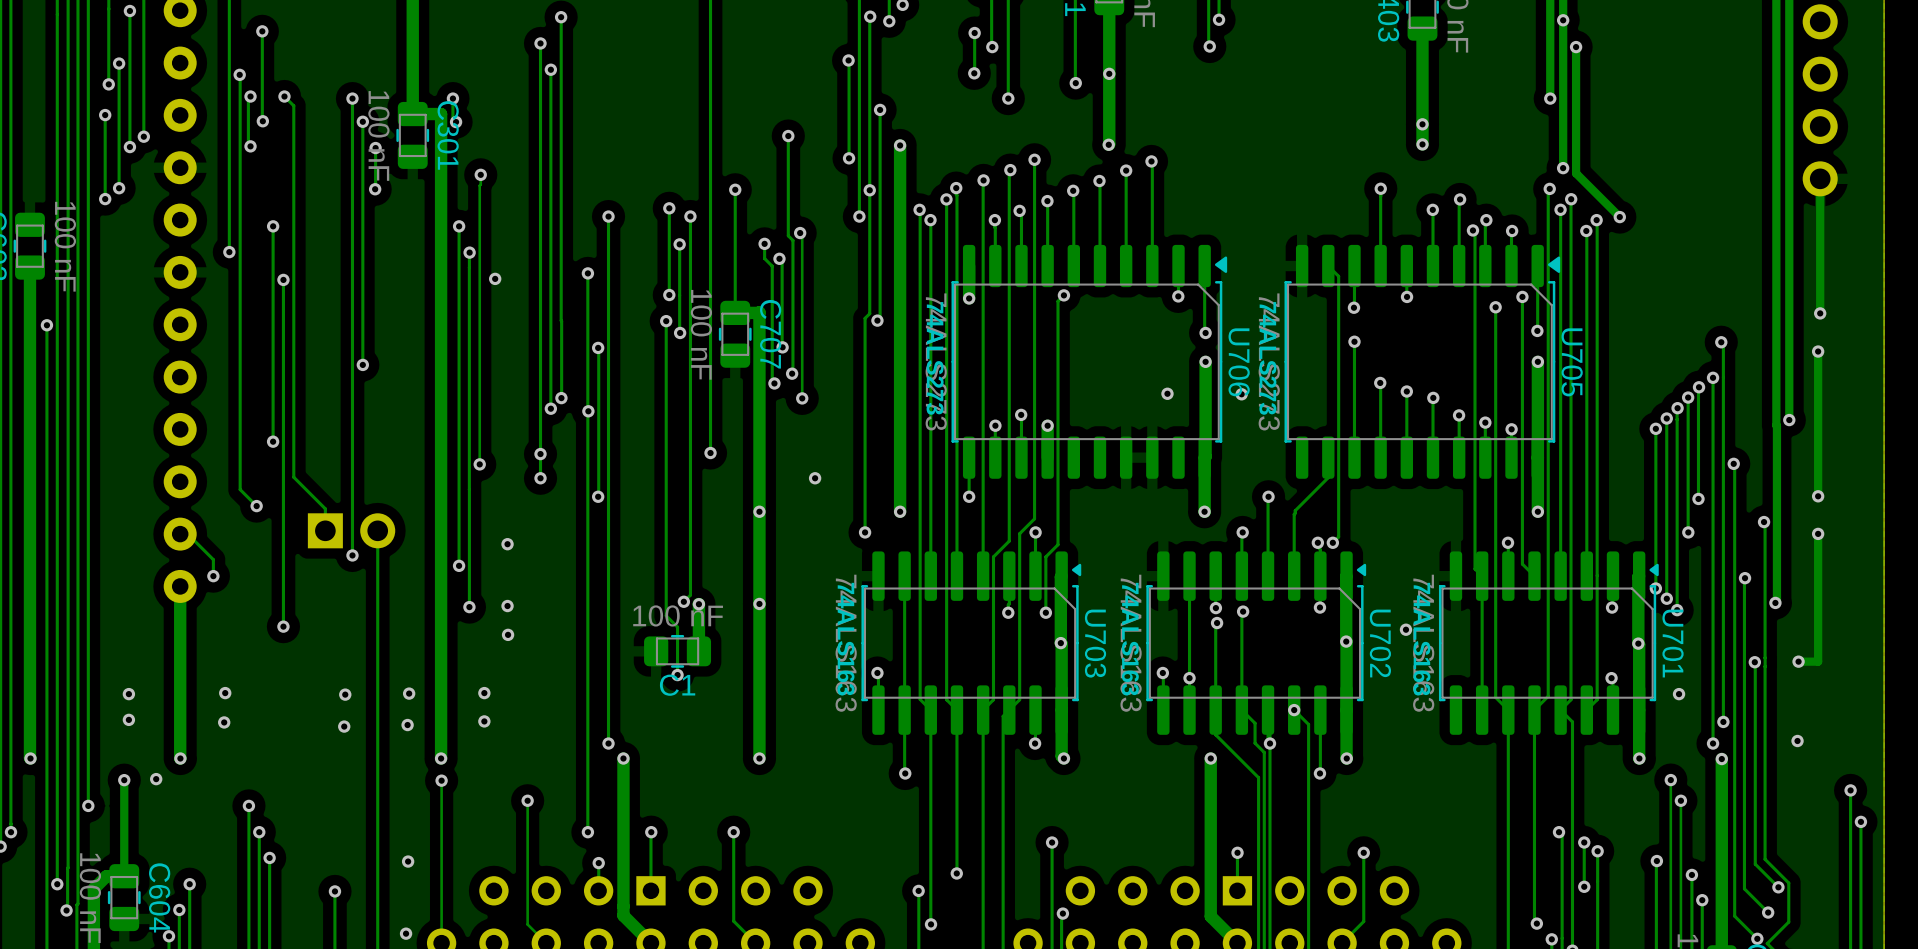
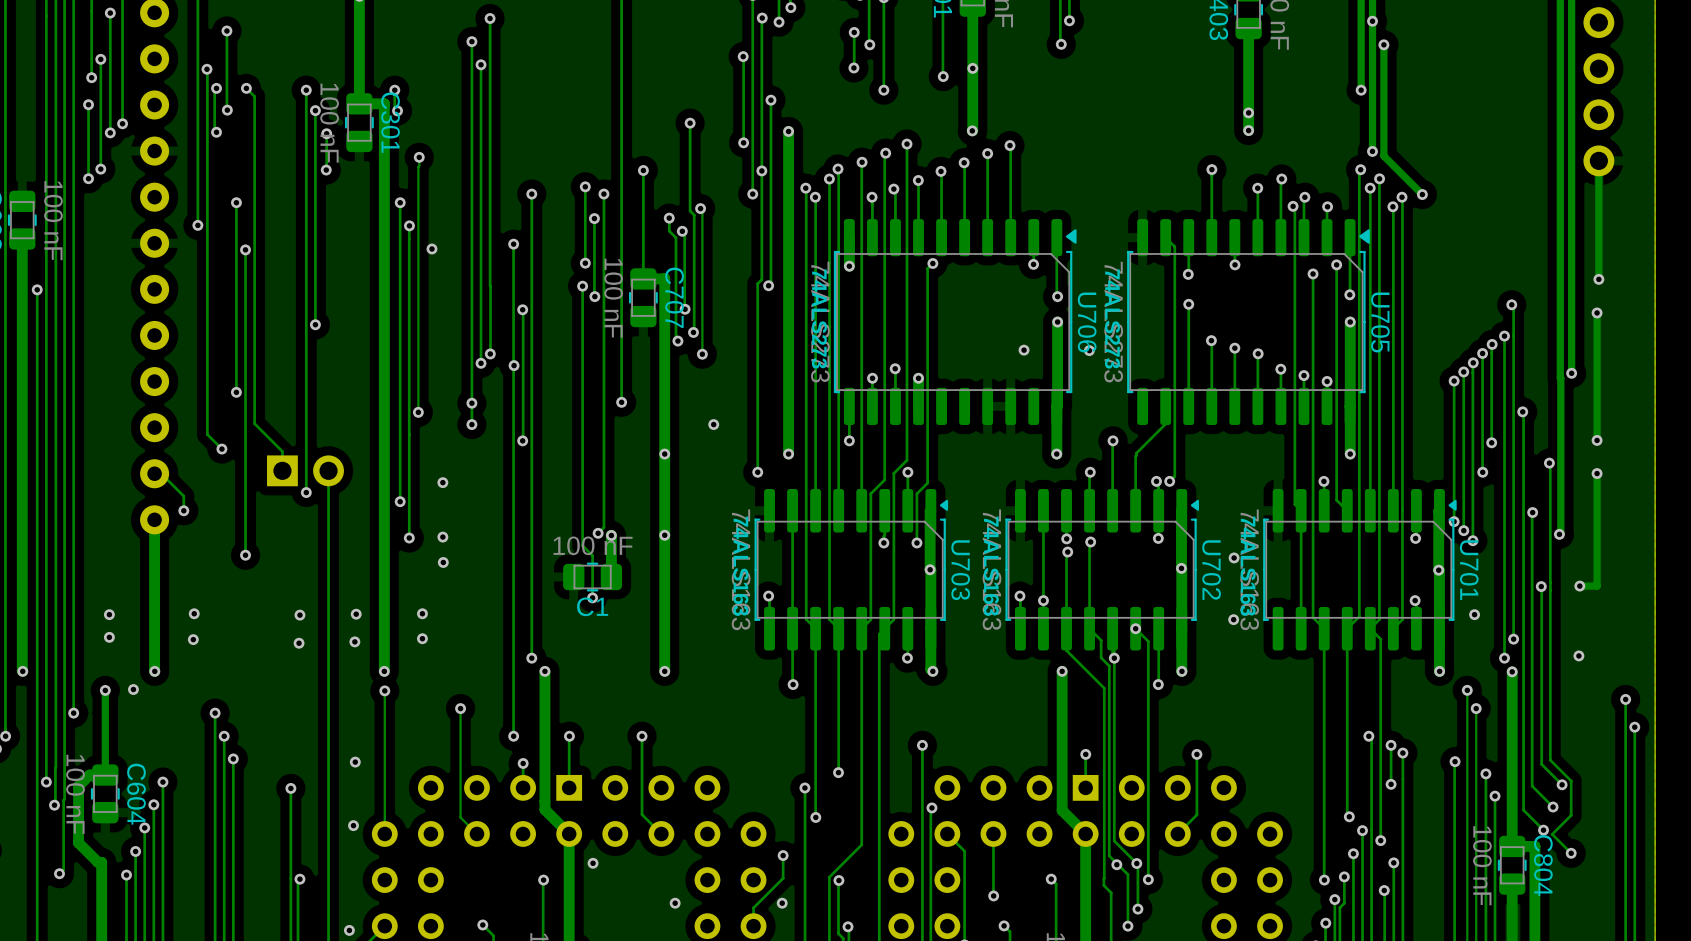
via: none -> (1233, 619)

